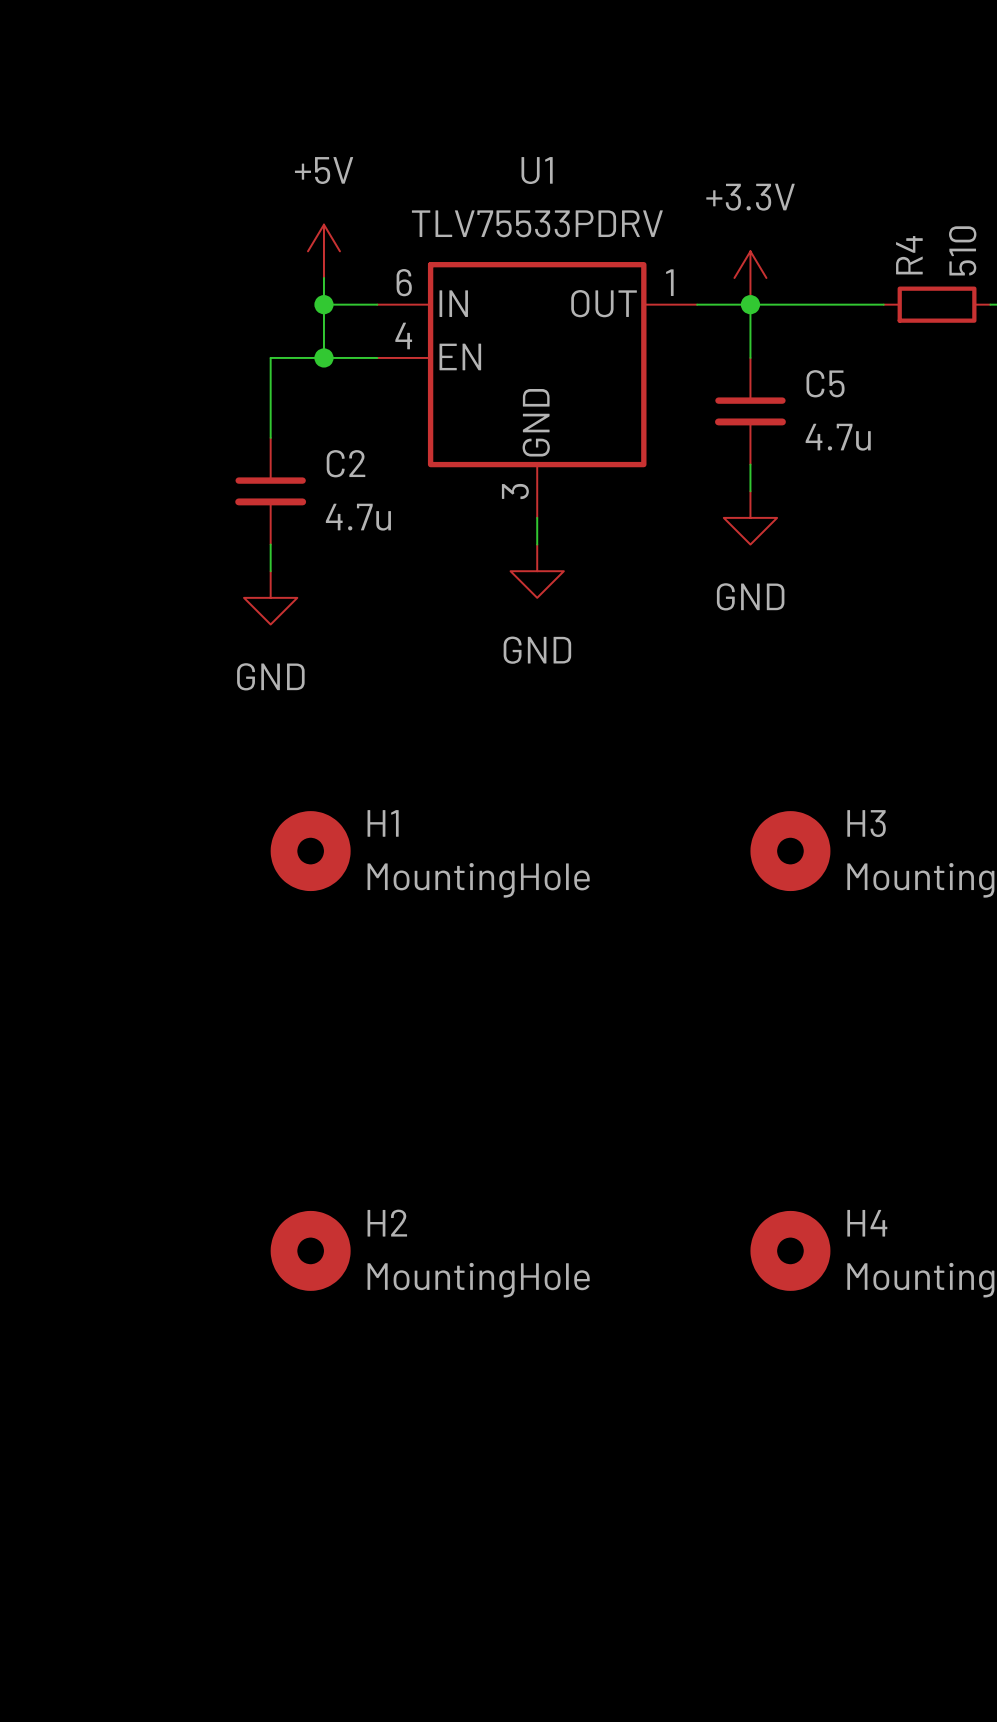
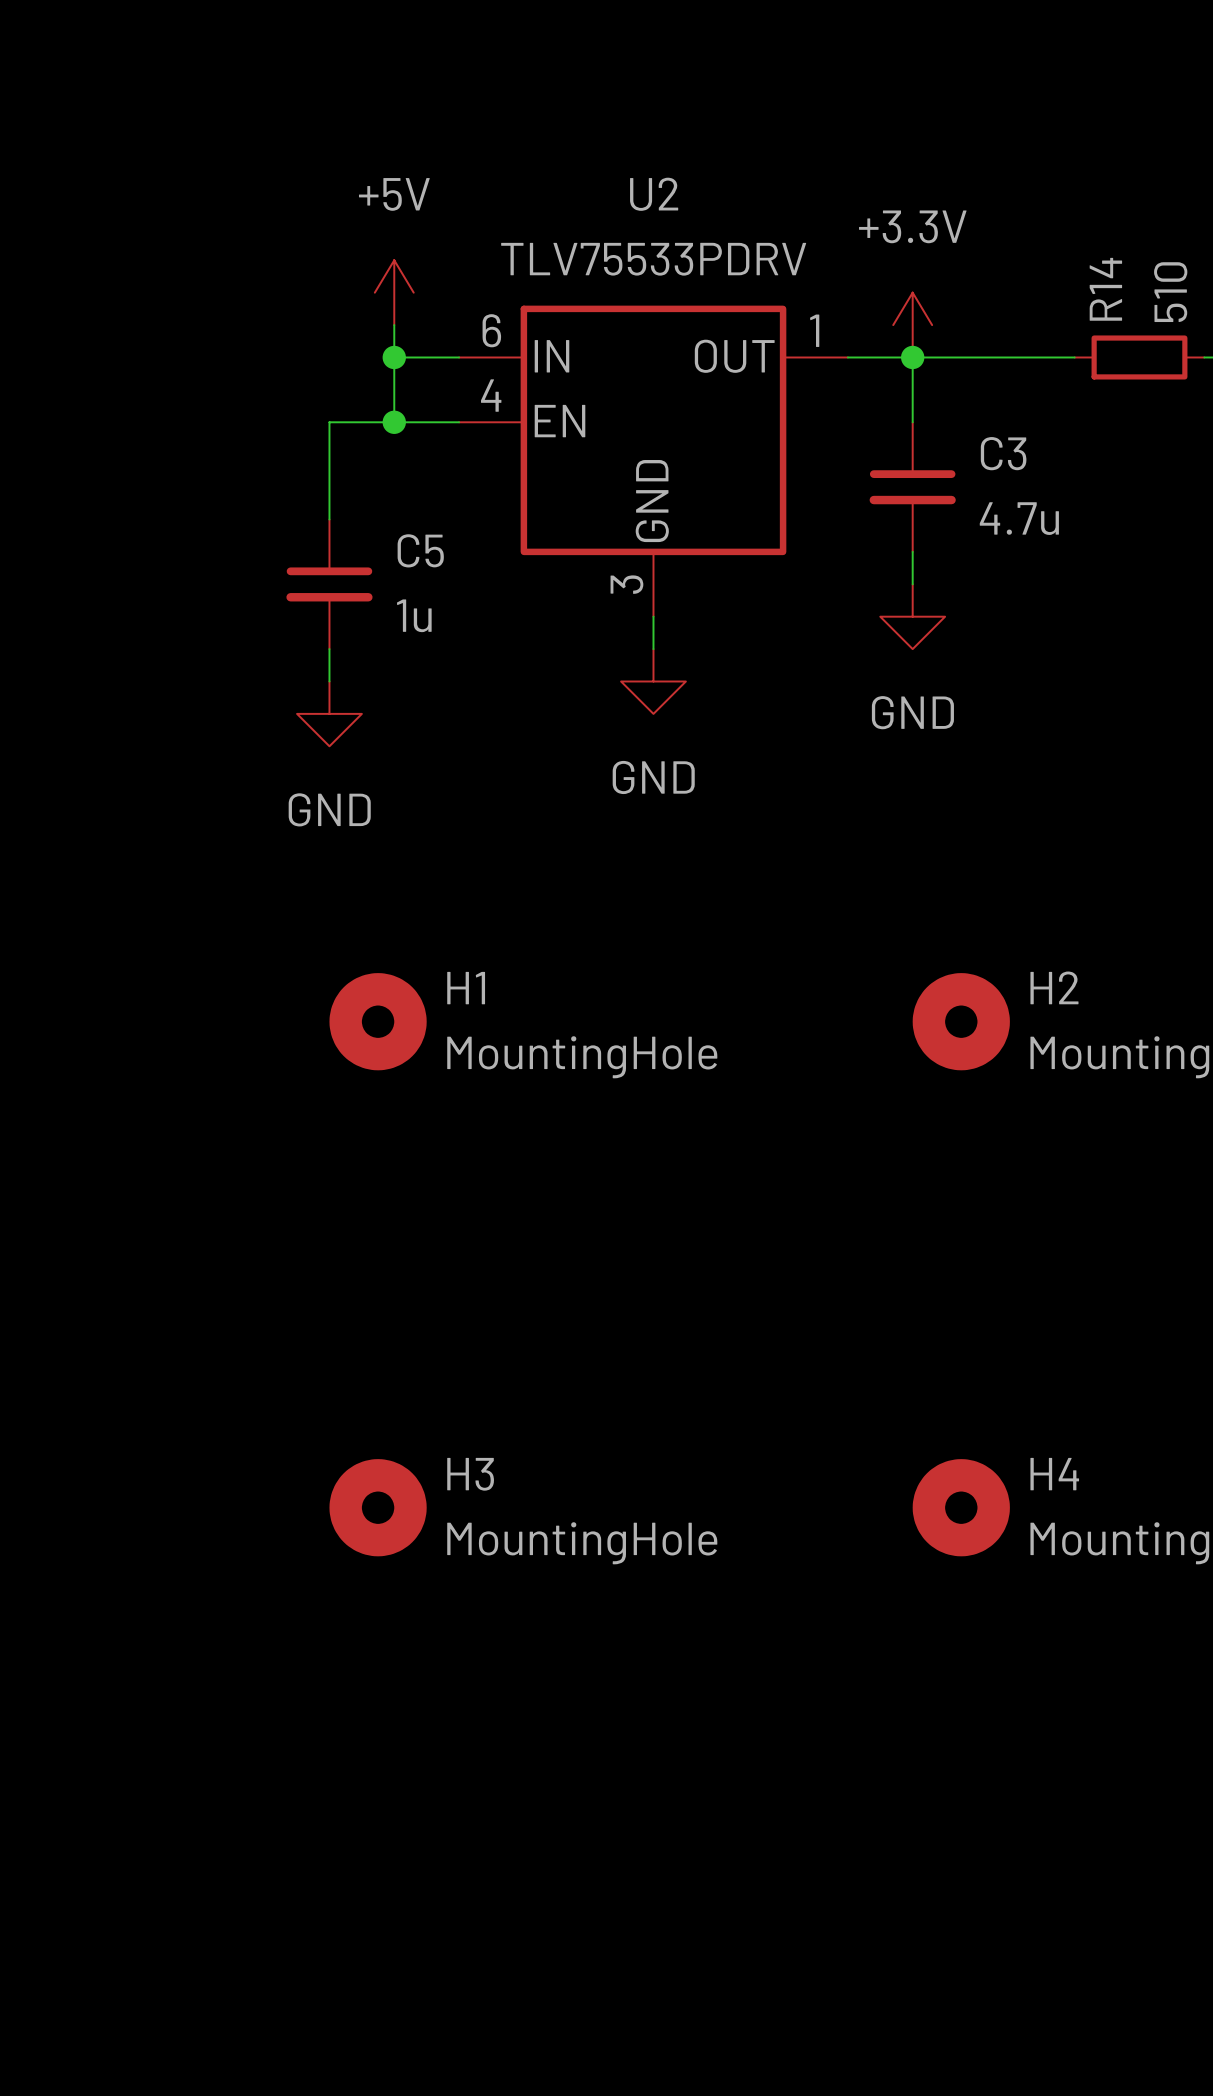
U1 name: U1 (537, 170) -> U2 (654, 194)
R4 name: R4 (909, 255) -> R14 (1105, 289)
C5 name: C5 (825, 383) -> C3 (1003, 453)
C2 name: C2 (346, 463) -> C5 (420, 550)
C2 value: 4.7u (358, 517) -> 1u (414, 615)
H3 name: H3 (866, 823) -> H2 (1054, 987)
H2 name: H2 (387, 1223) -> H3 (470, 1474)

